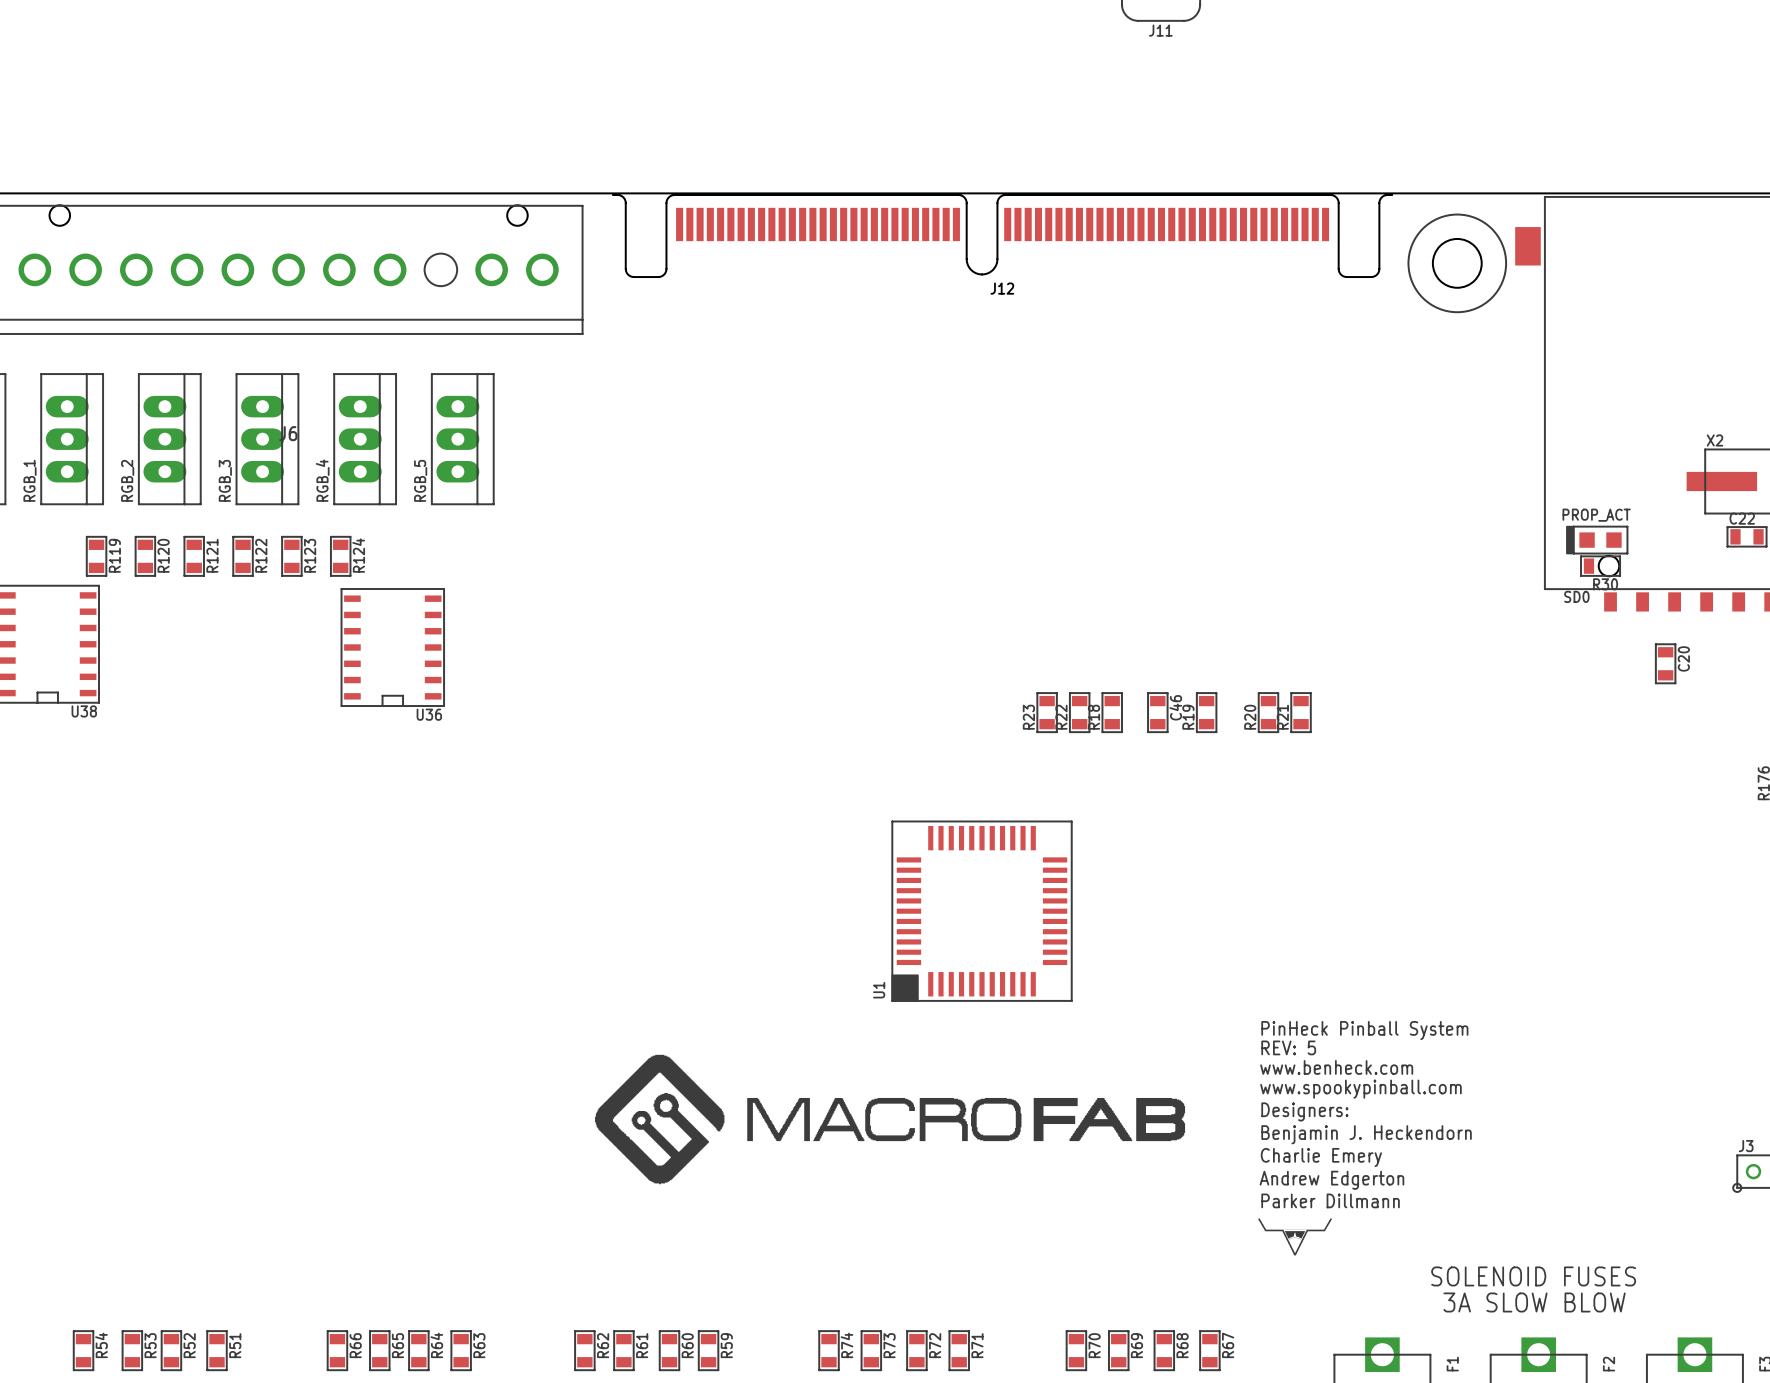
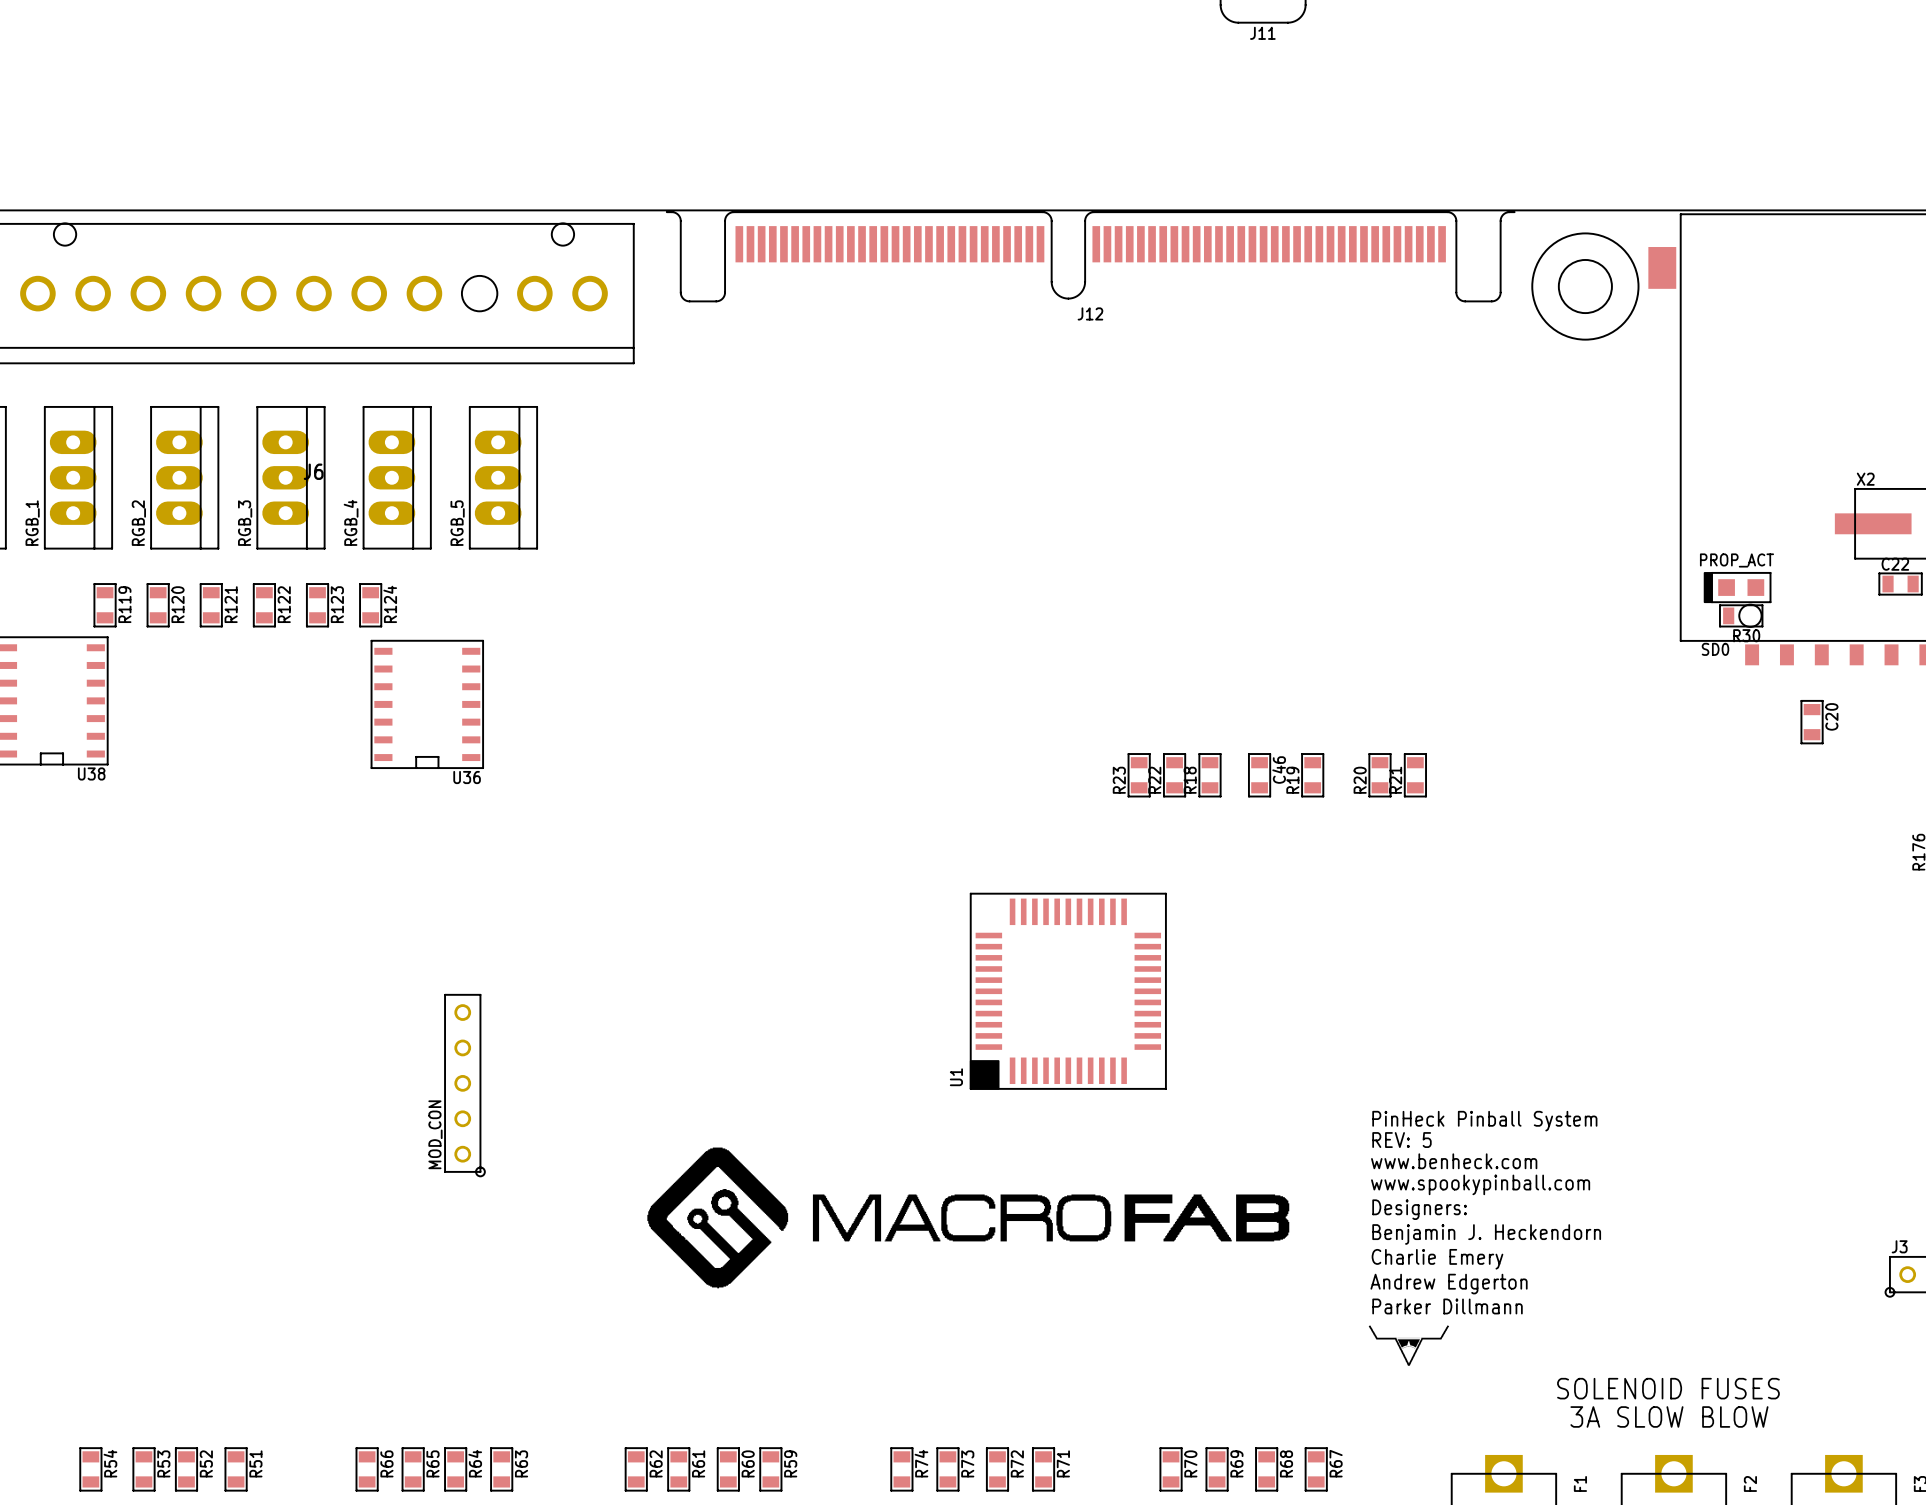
MOD_CON: none -> (464, 1085)

